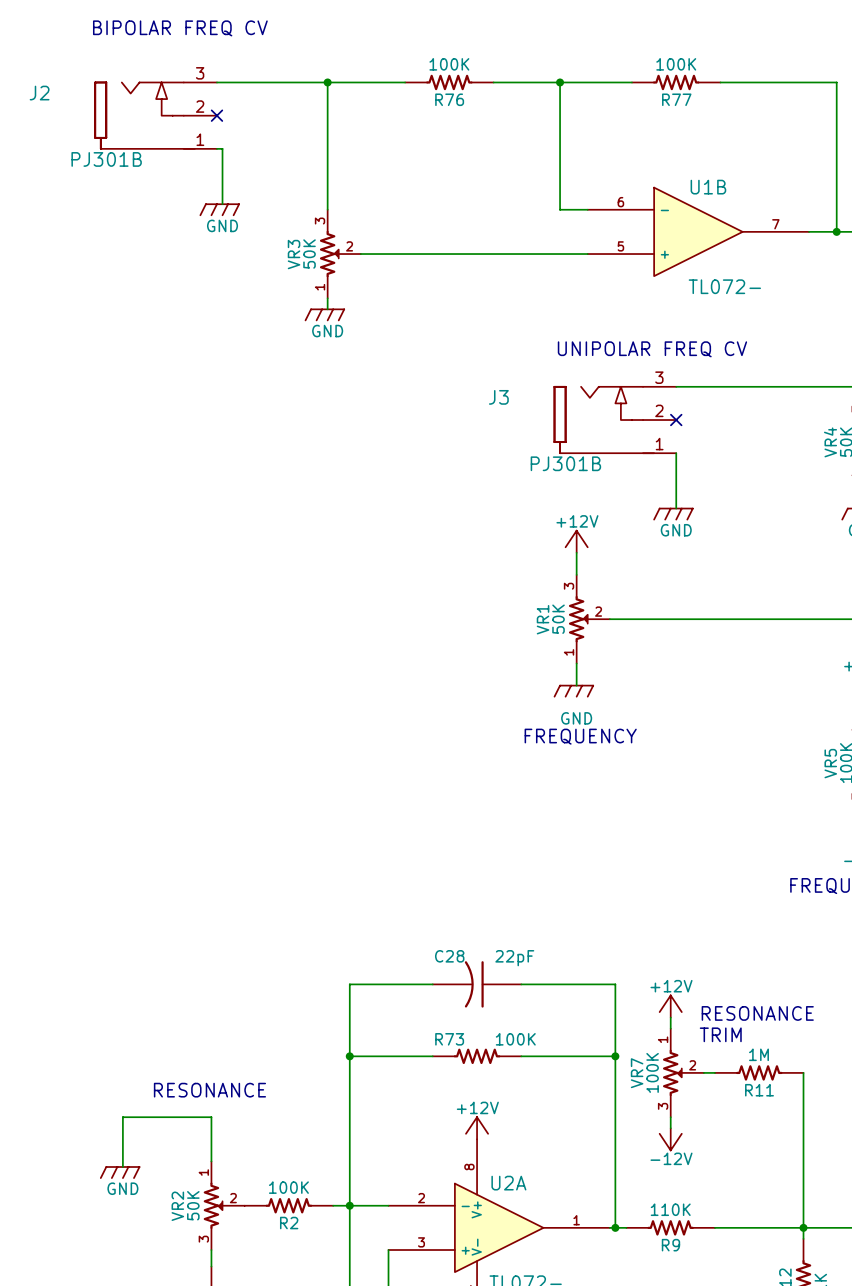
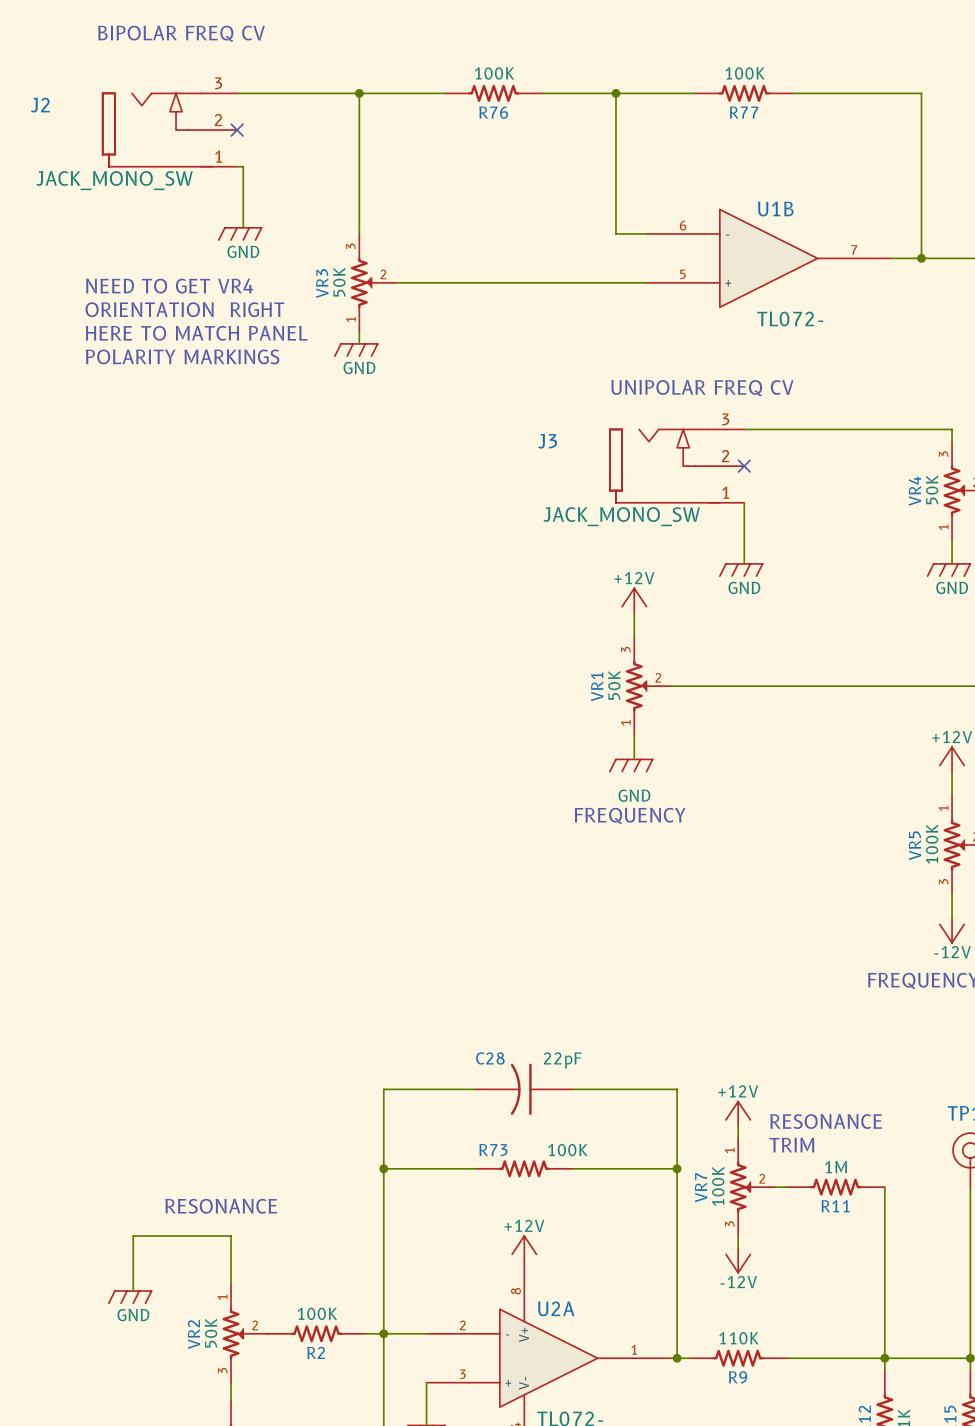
J2 value: PJ301B (106, 159) -> JACK_MONO_SW (114, 180)
text: none -> NEED TO GET VR4 (169, 286)
text: none -> ORIENTATION RIGHT (184, 309)
text: none -> HERE TO MATCH PANEL (196, 333)
text: none -> POLARITY MARKINGS (182, 356)
J3 value: PJ301B (565, 463) -> JACK_MONO_SW (621, 516)

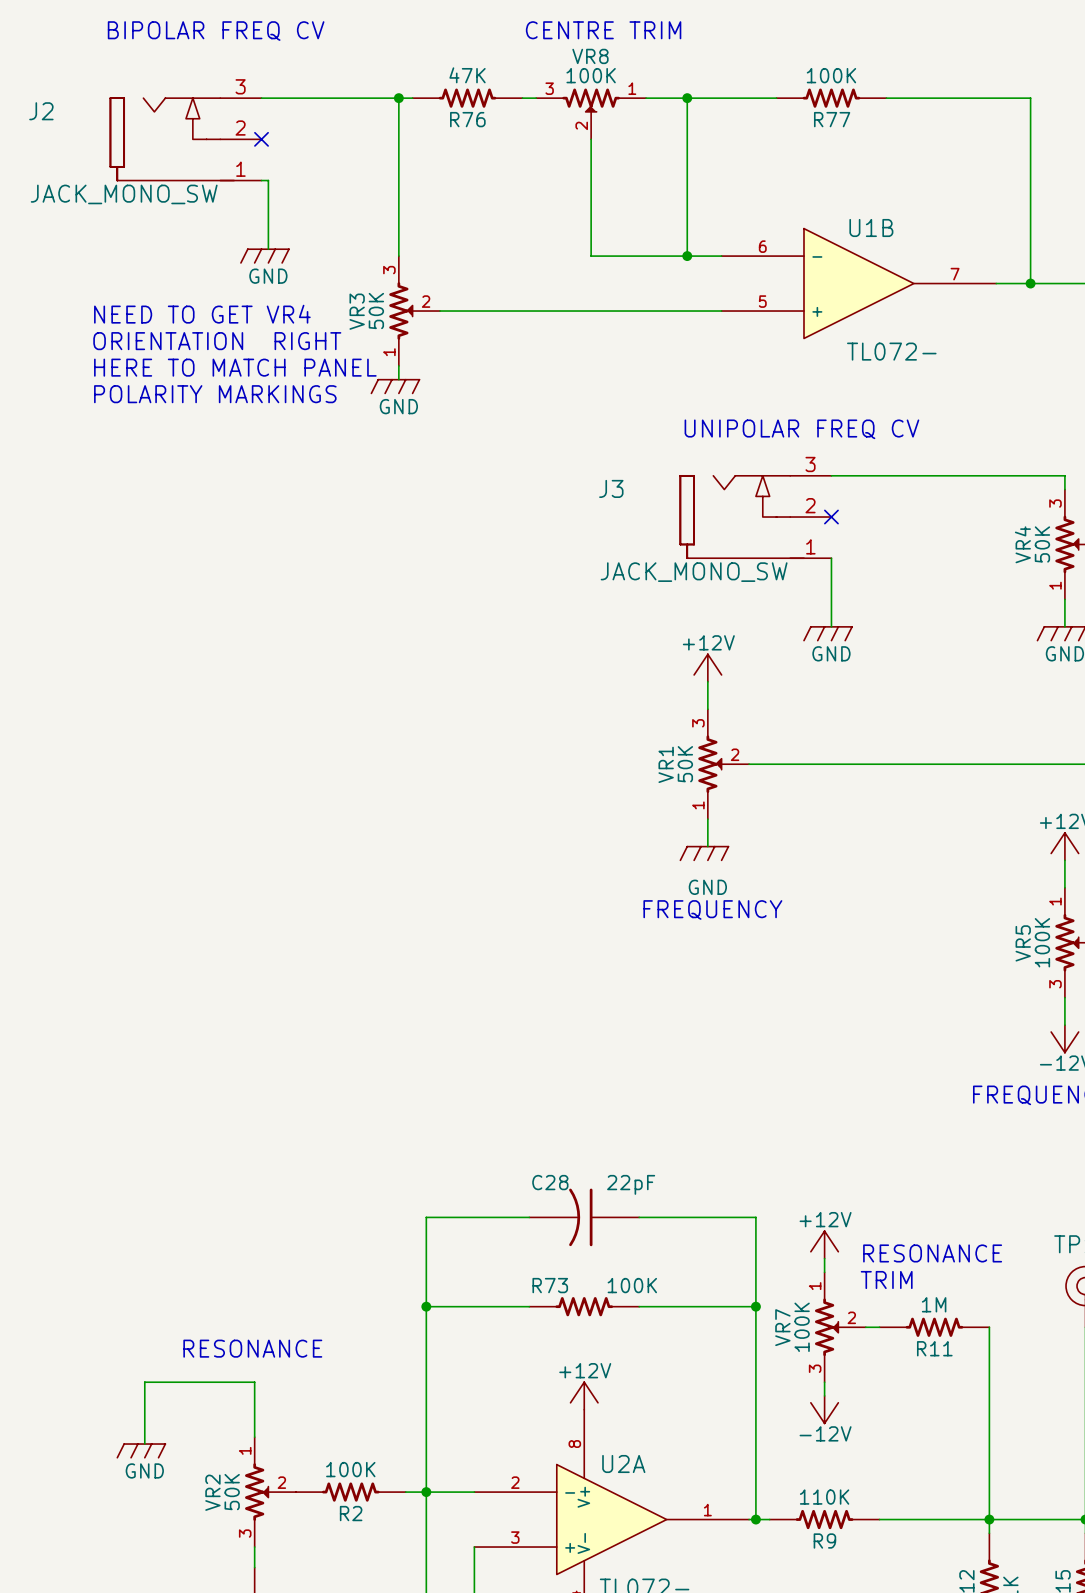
text: none -> CENTRE TRIM (603, 30)
R76 value: 100K (494, 73) -> 47K (467, 75)
R76 position: (493, 93) -> (467, 98)
VR8: none -> 100K (591, 113)
wire: none -> (591, 139) (591, 256) (687, 256)
junction: none -> (687, 256)

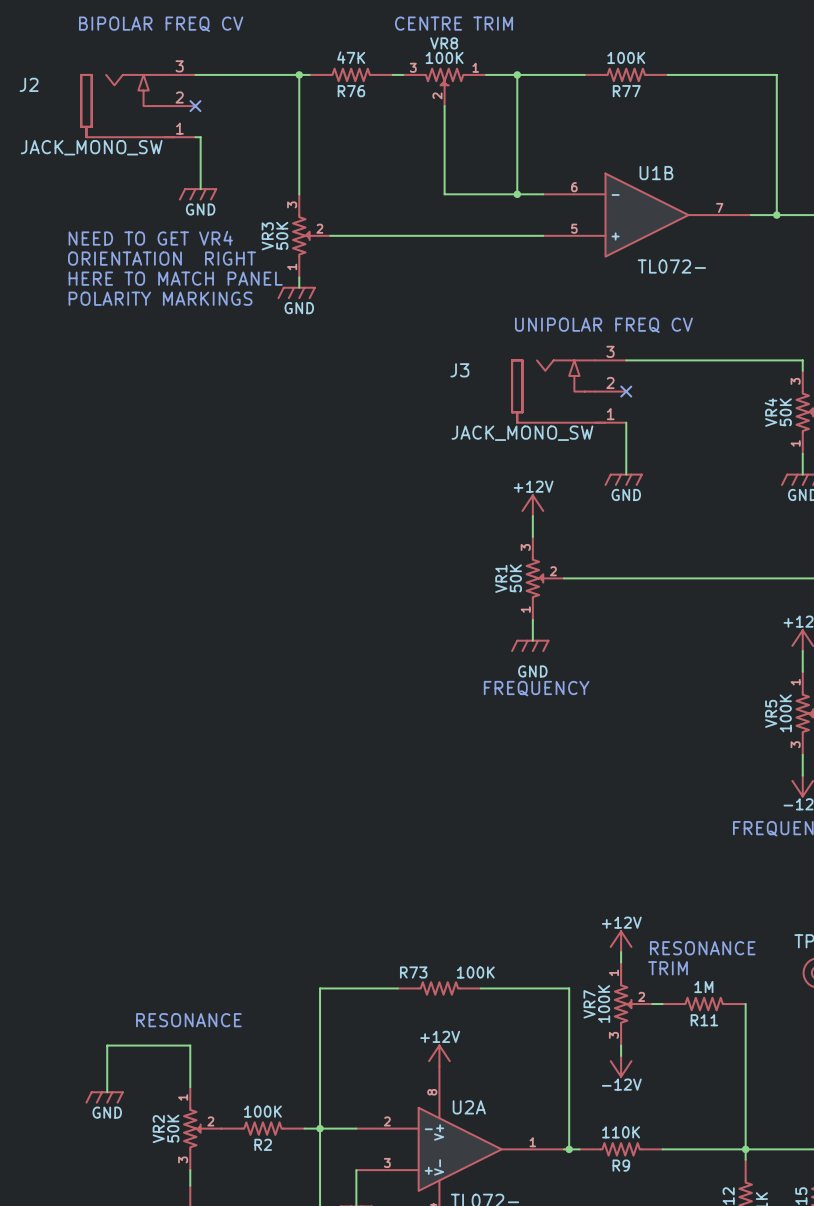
wire: (529, 1217) (426, 1217) (426, 1306) -> none
C28: 22pF (584, 1217) -> none
wire: (639, 1217) (755, 1217) (755, 1306) -> none
junction: (426, 1306) -> none
junction: (755, 1306) -> none

